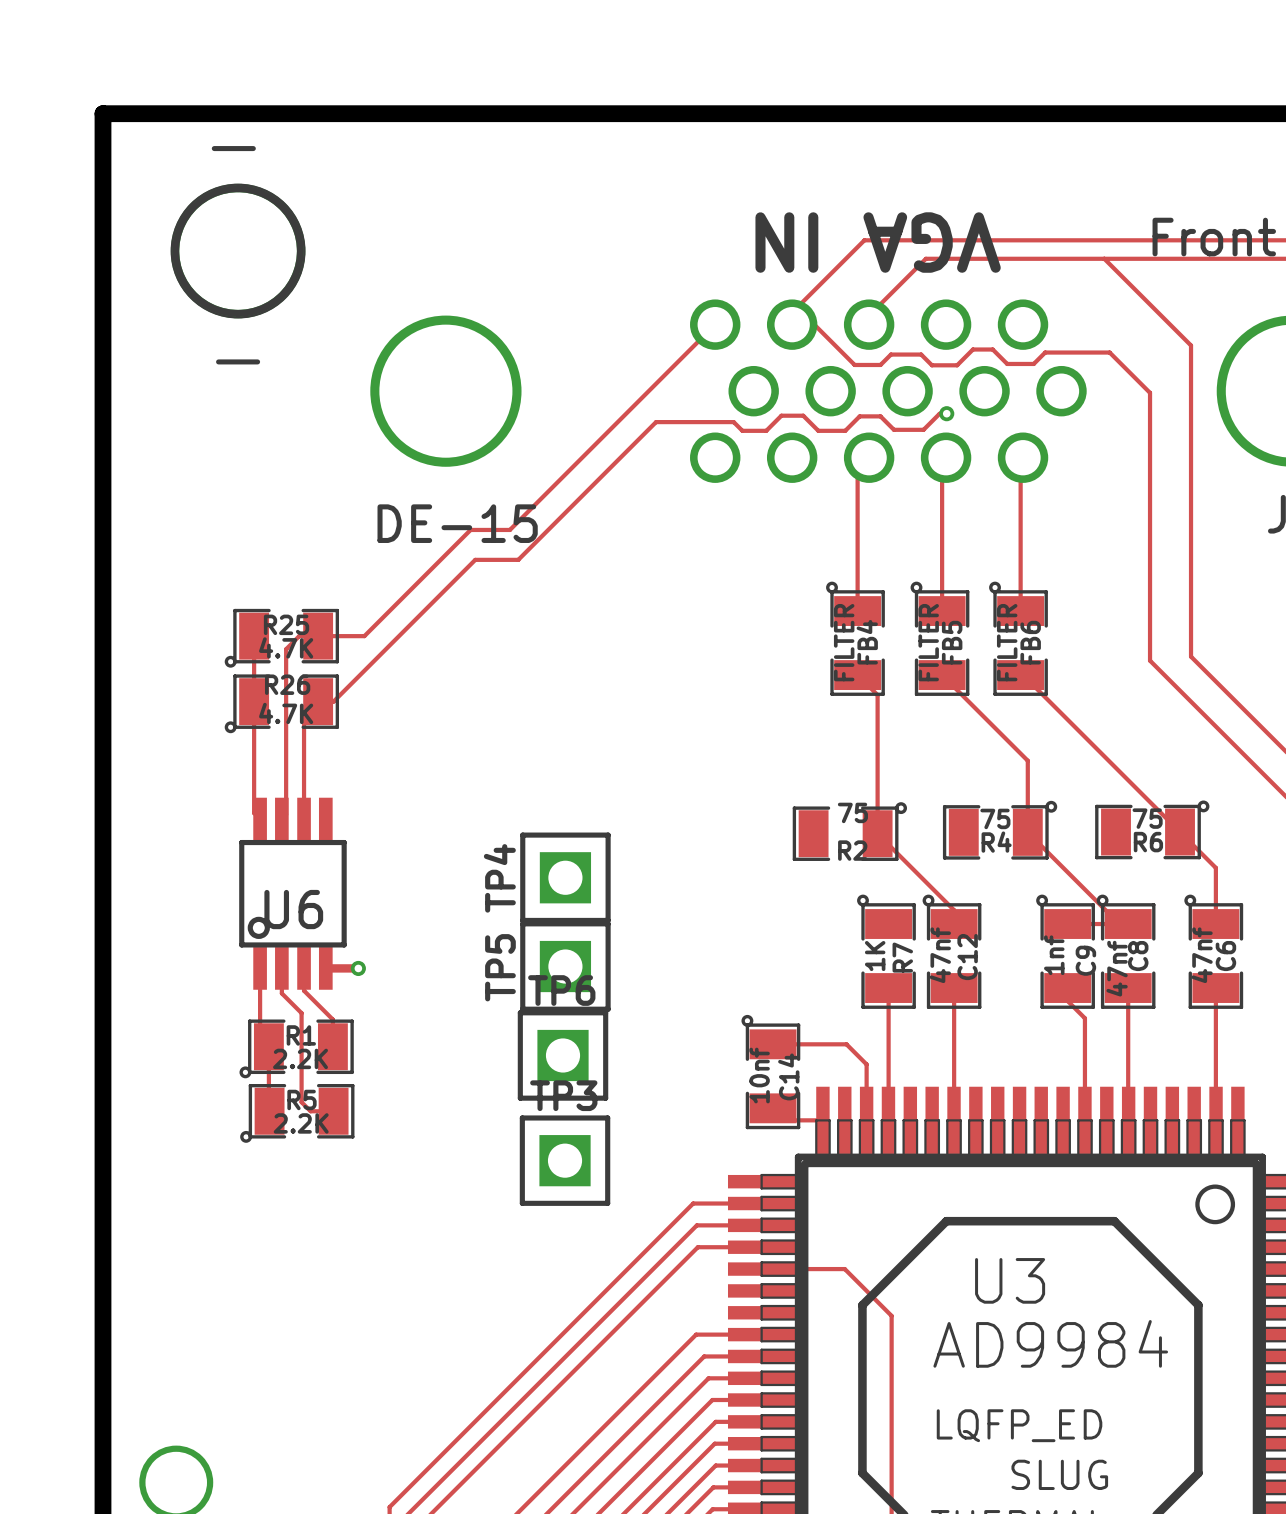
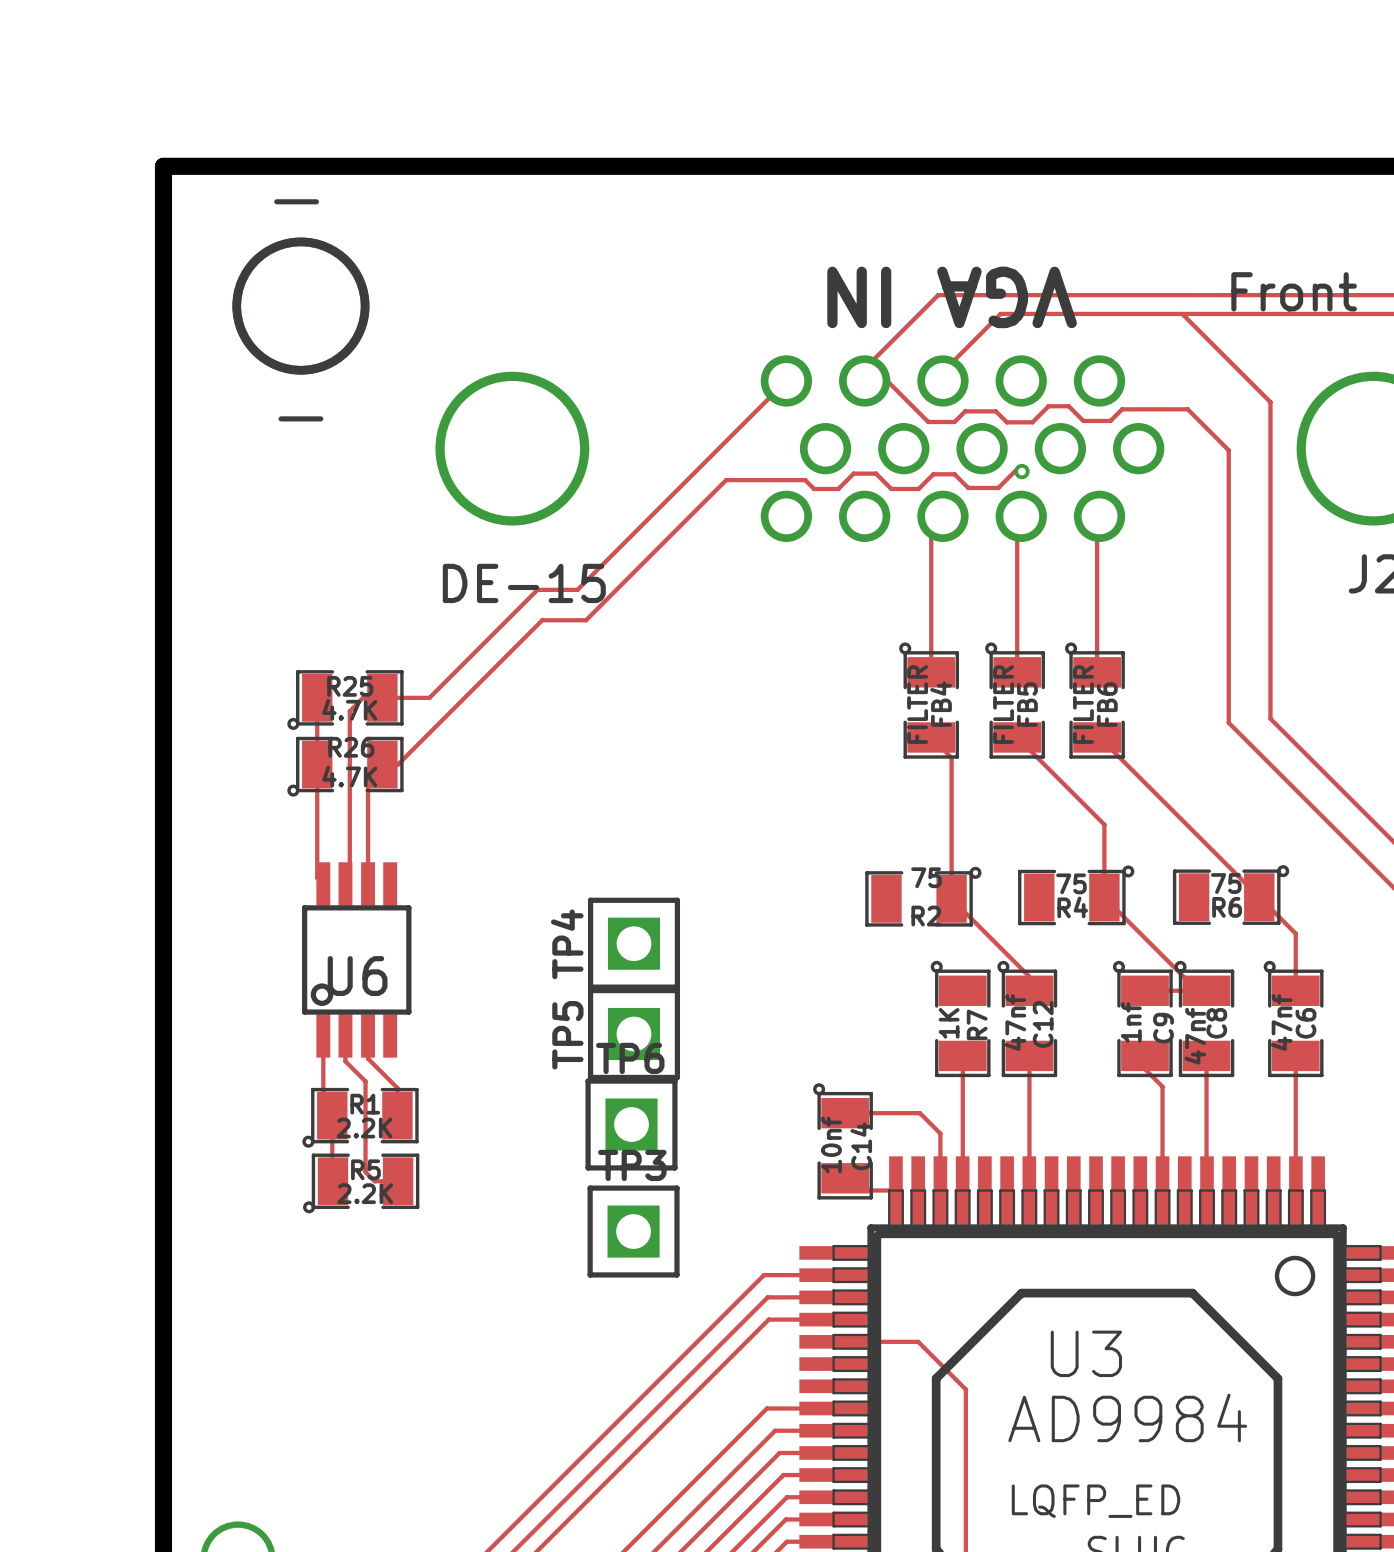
track: (325, 968) (358, 968) -> none
via: (358, 968) -> none

